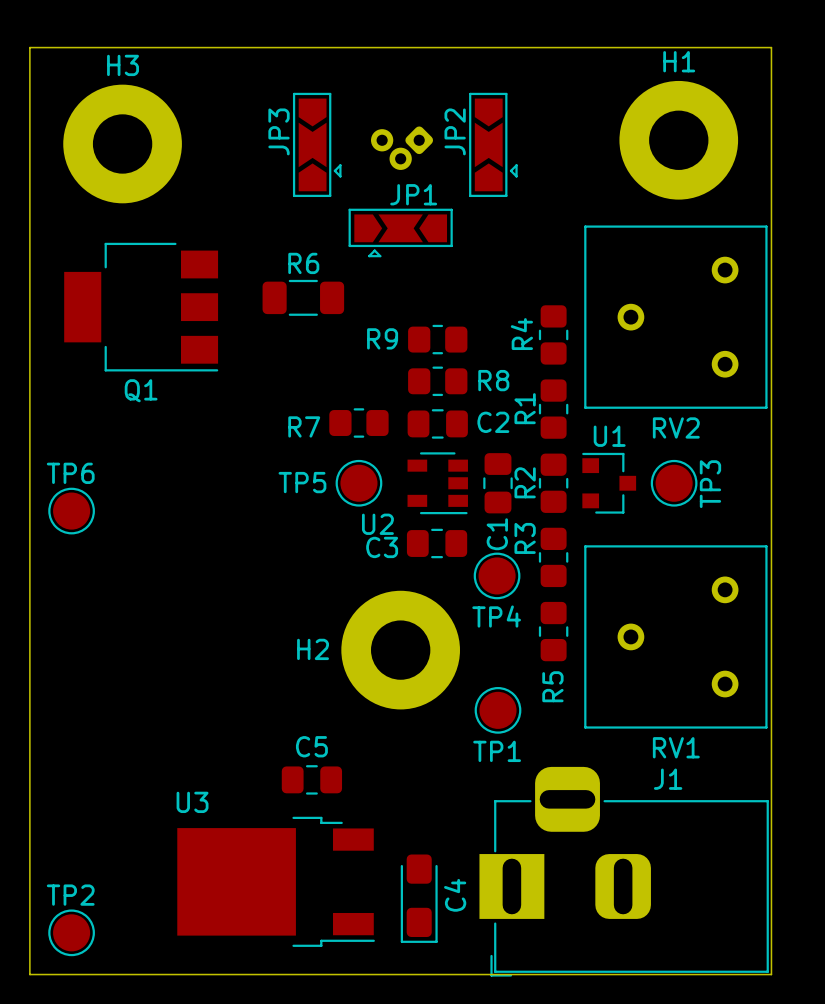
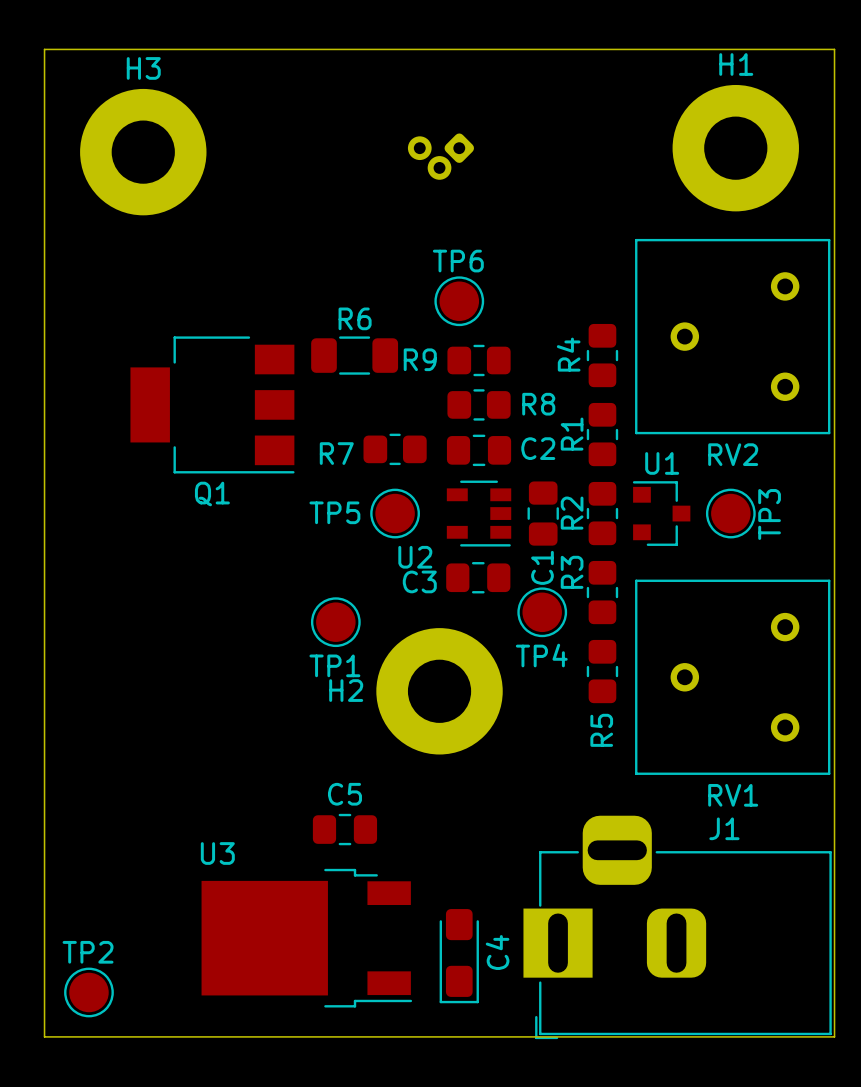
JP3: (317, 144) -> none
JP2: (493, 144) -> none
JP1: (400, 232) -> none
R6 position: (303, 297) -> (354, 355)
Q1 position: (141, 307) -> (212, 404)
TP6 position: (71, 511) -> (459, 301)
TP1 position: (498, 710) -> (335, 622)

